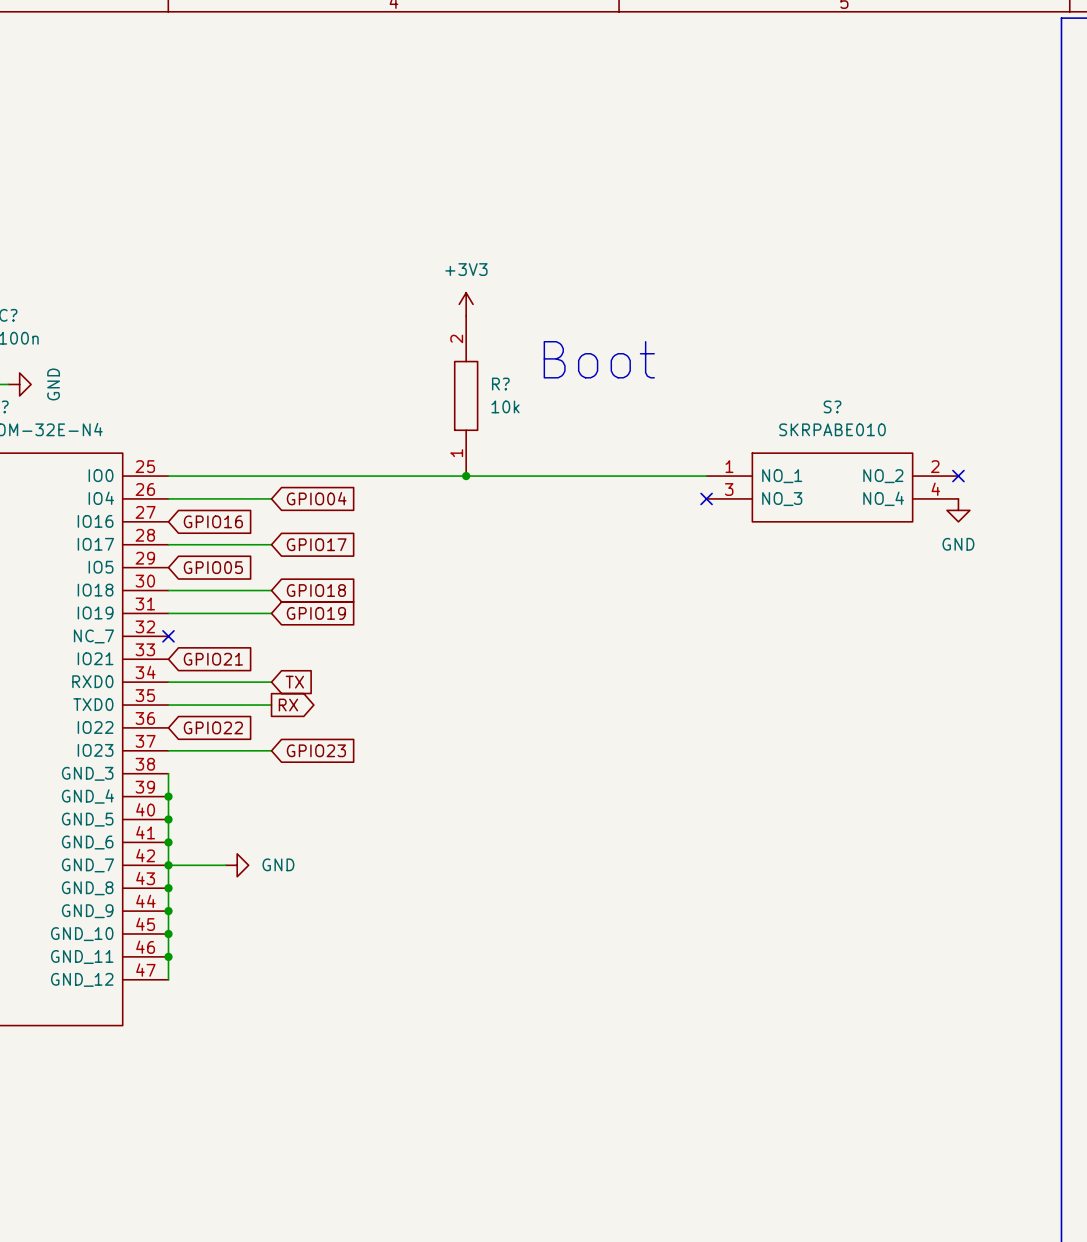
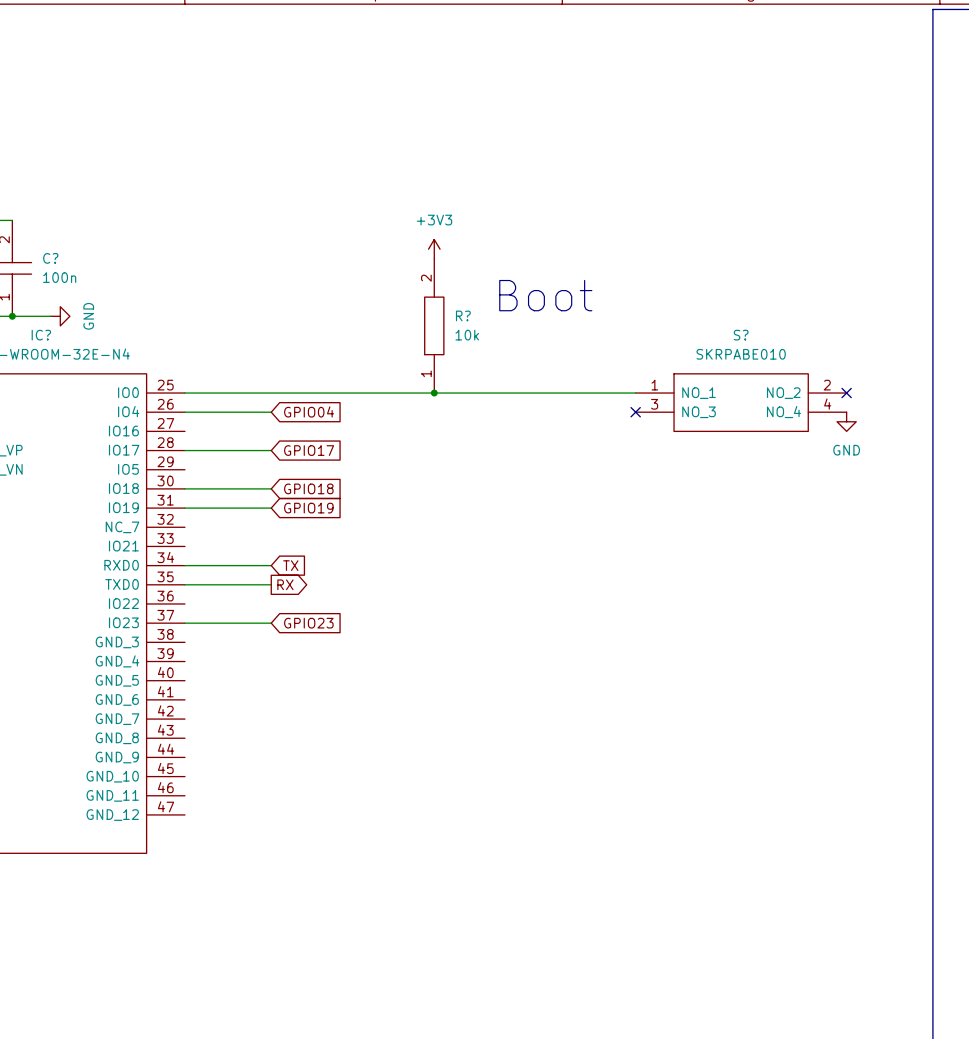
global label: GPIO16 (213, 521) -> none
global label: GPIO05 (213, 567) -> none
no-connect mark: (168, 636) -> none
global label: GPIO21 (213, 659) -> none
global label: GPIO22 (213, 727) -> none
wire: (168, 773) (168, 979) -> none
junction: (168, 796) -> none
junction: (168, 819) -> none
junction: (168, 842) -> none
wire: (168, 865) (225, 865) -> none
junction: (168, 865) -> none
power symbol: GND (237, 865) -> none
junction: (168, 888) -> none
junction: (168, 911) -> none
junction: (168, 933) -> none
junction: (168, 956) -> none

